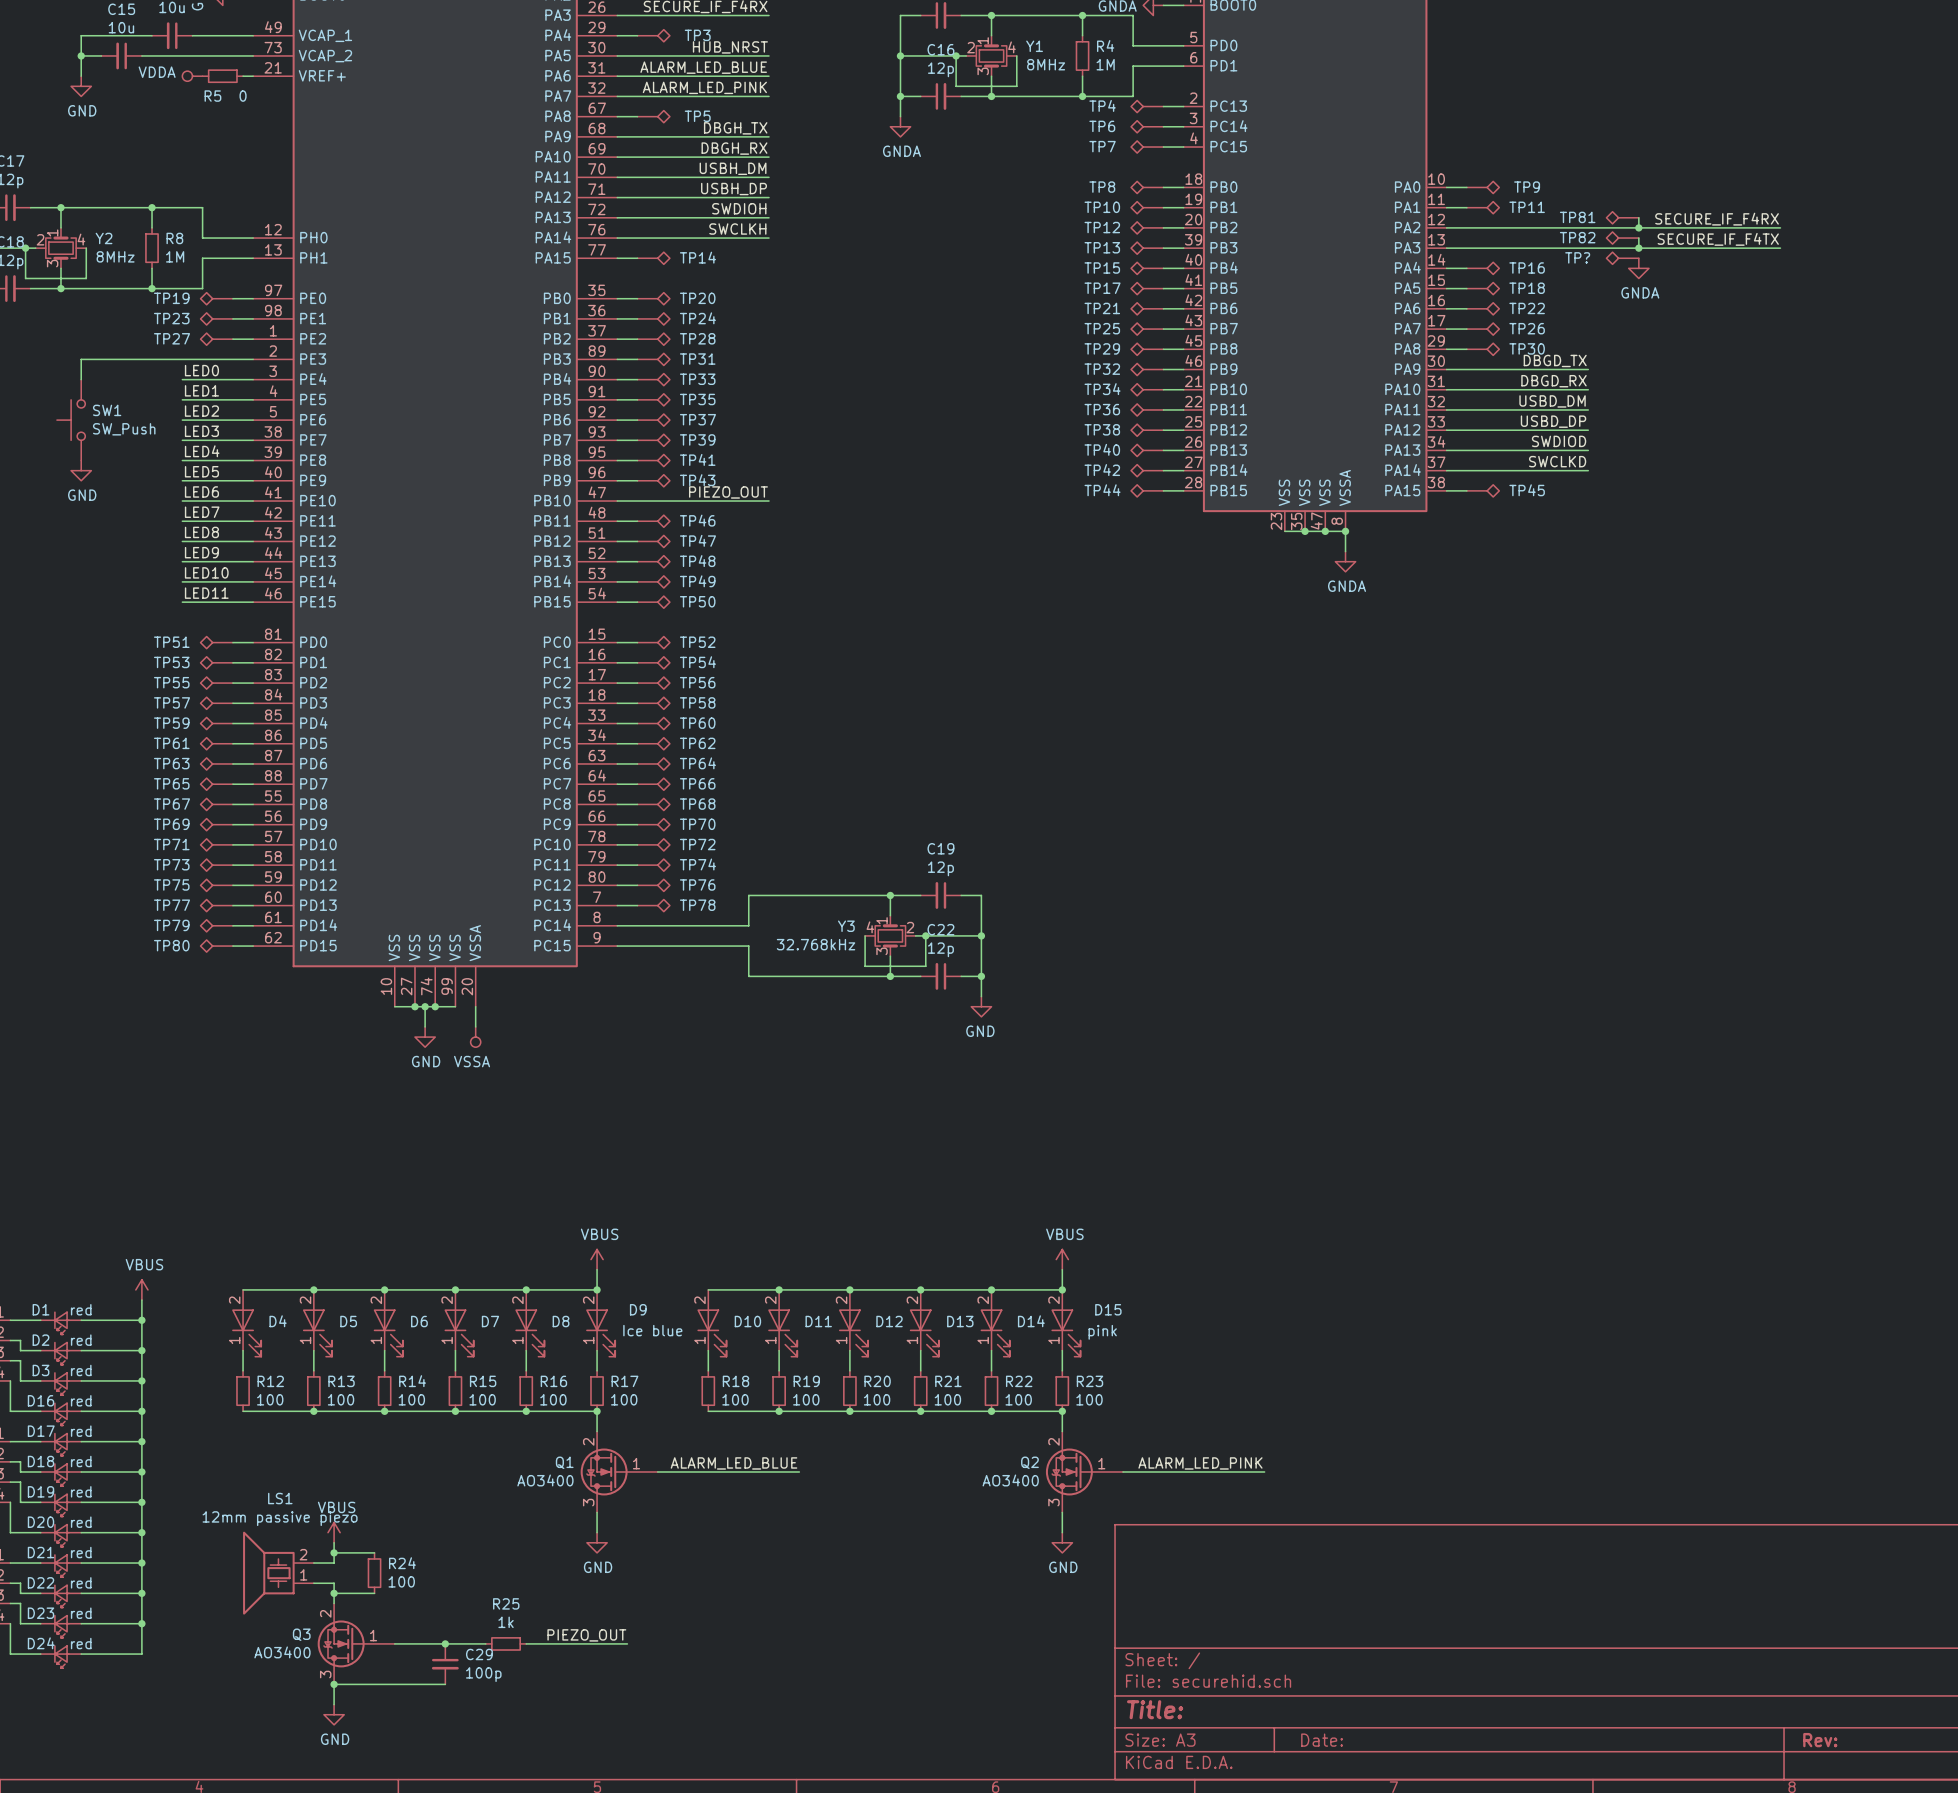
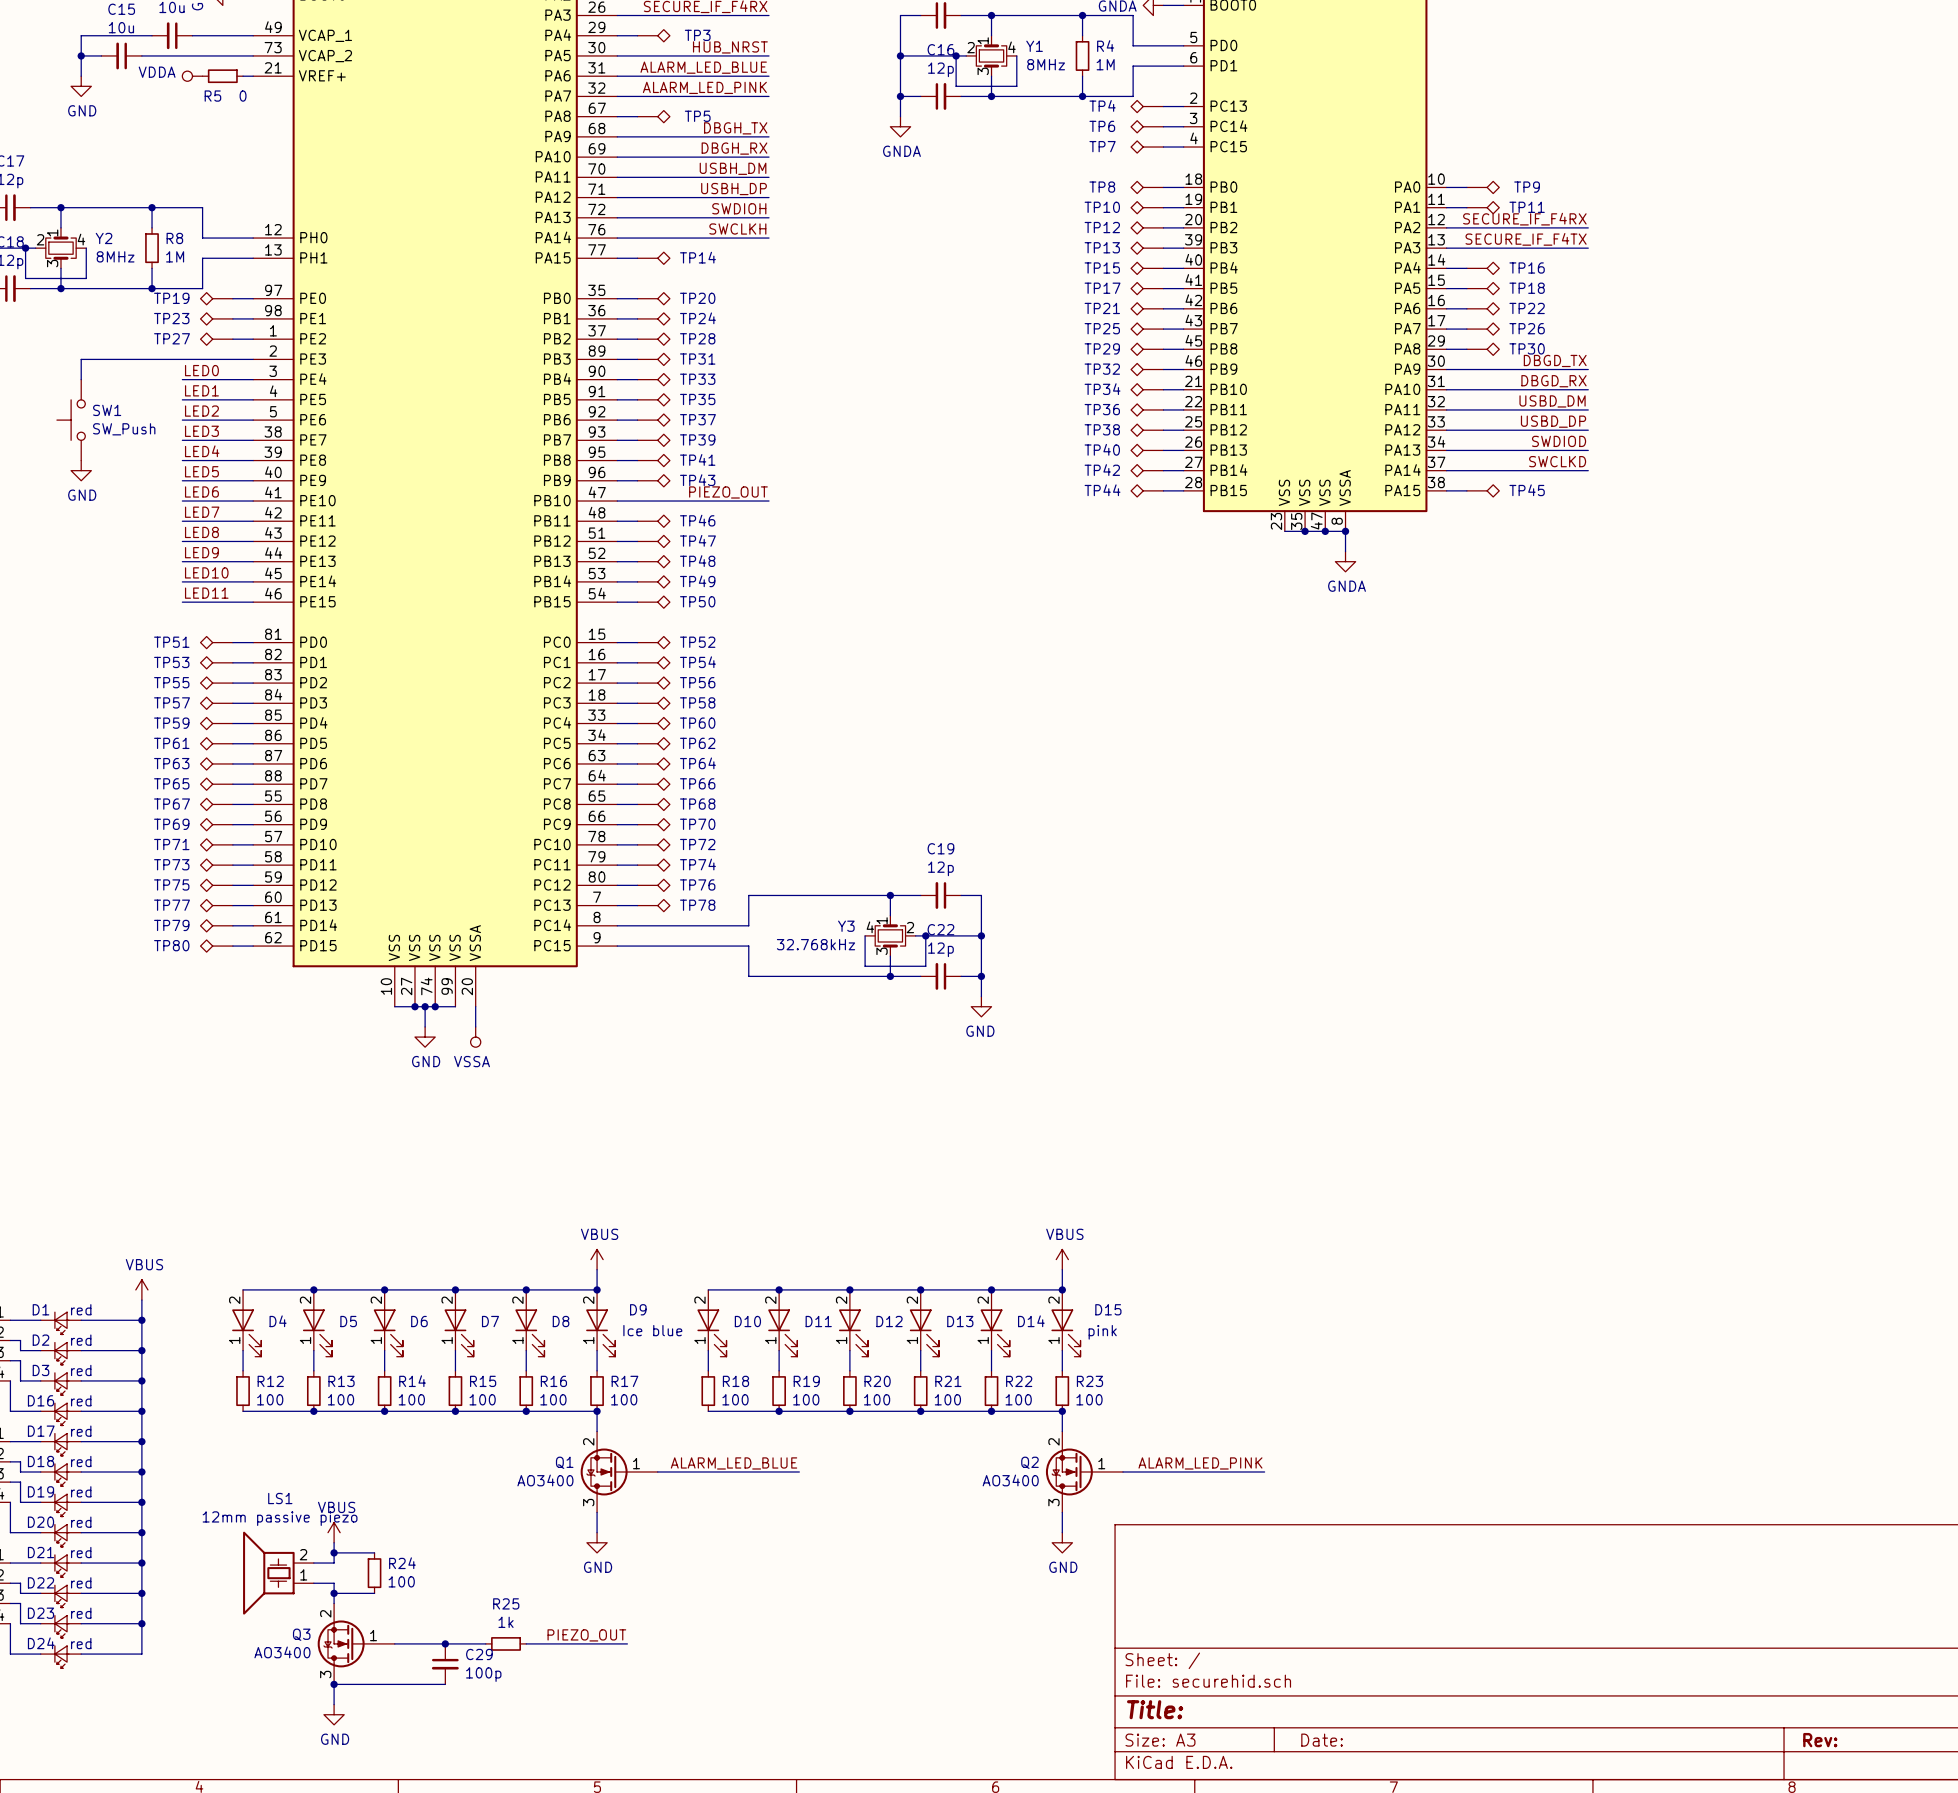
TP81: (1622, 217) -> none
wire: (1638, 217) (1638, 227) -> none
label position: SECURE_IF_F4RX (1717, 219) -> SECURE_IF_F4RX (1524, 219)
wire: (1588, 227) (1780, 227) -> none
junction: (1638, 227) -> none
TP82: (1622, 238) -> none
wire: (1638, 238) (1638, 248) -> none
label position: SECURE_IF_F4TX (1718, 239) -> SECURE_IF_F4TX (1526, 239)
wire: (1588, 248) (1780, 248) -> none
junction: (1638, 248) -> none
TP?: (1622, 258) -> none
power symbol: GNDA (1638, 268) -> none

